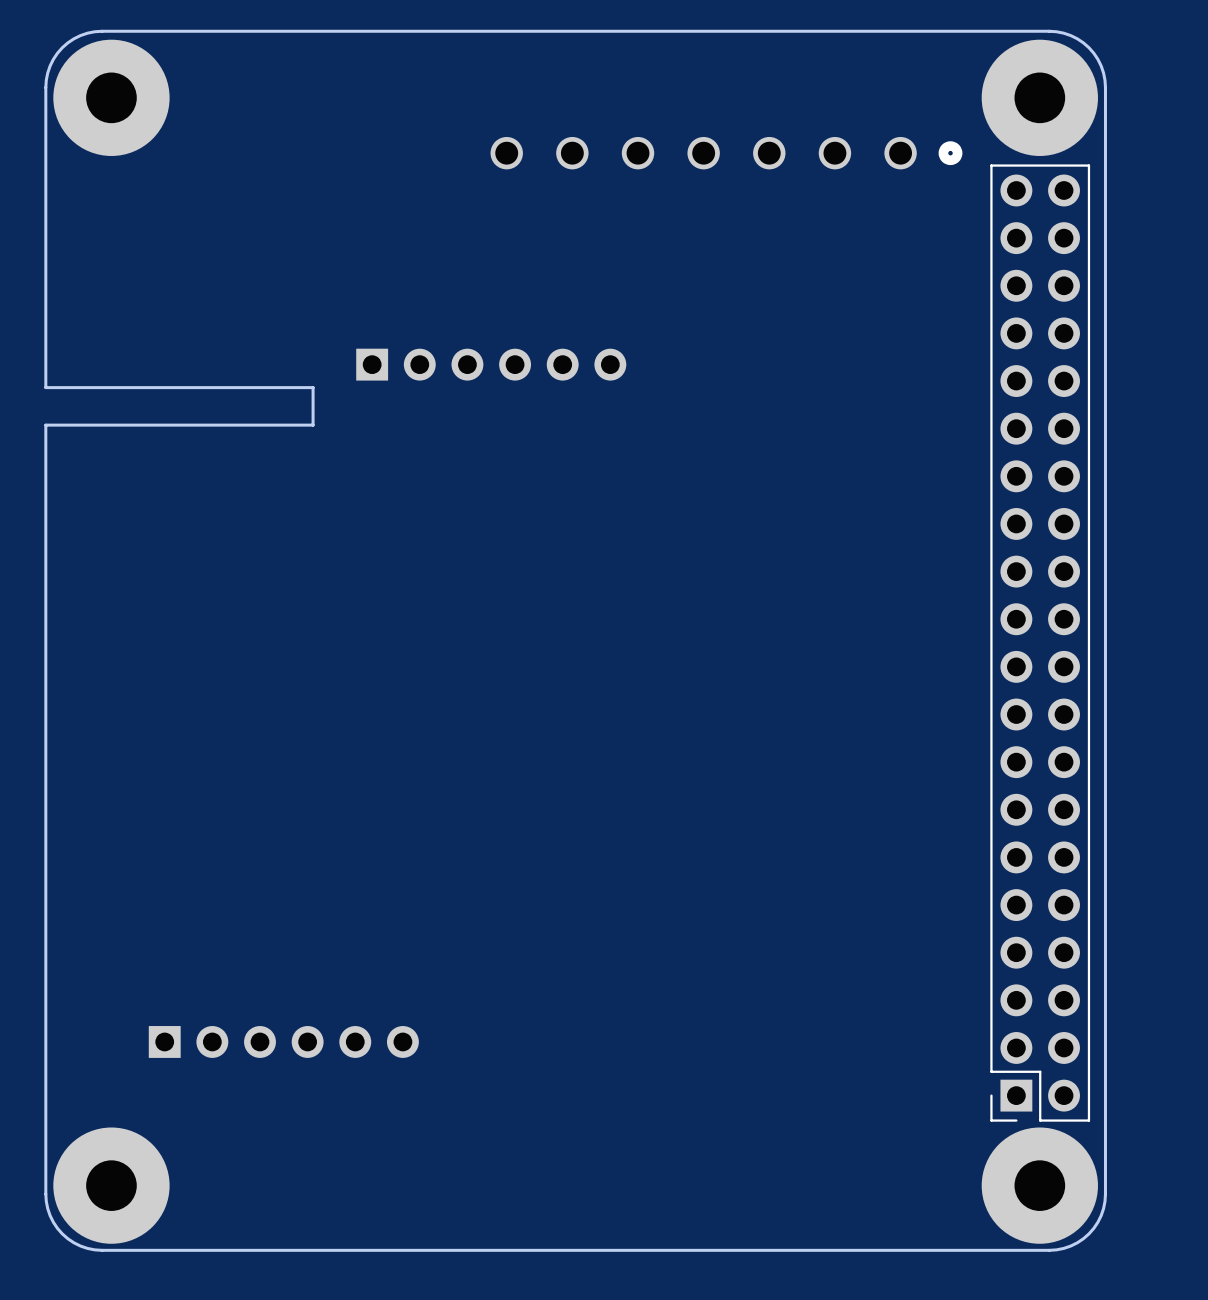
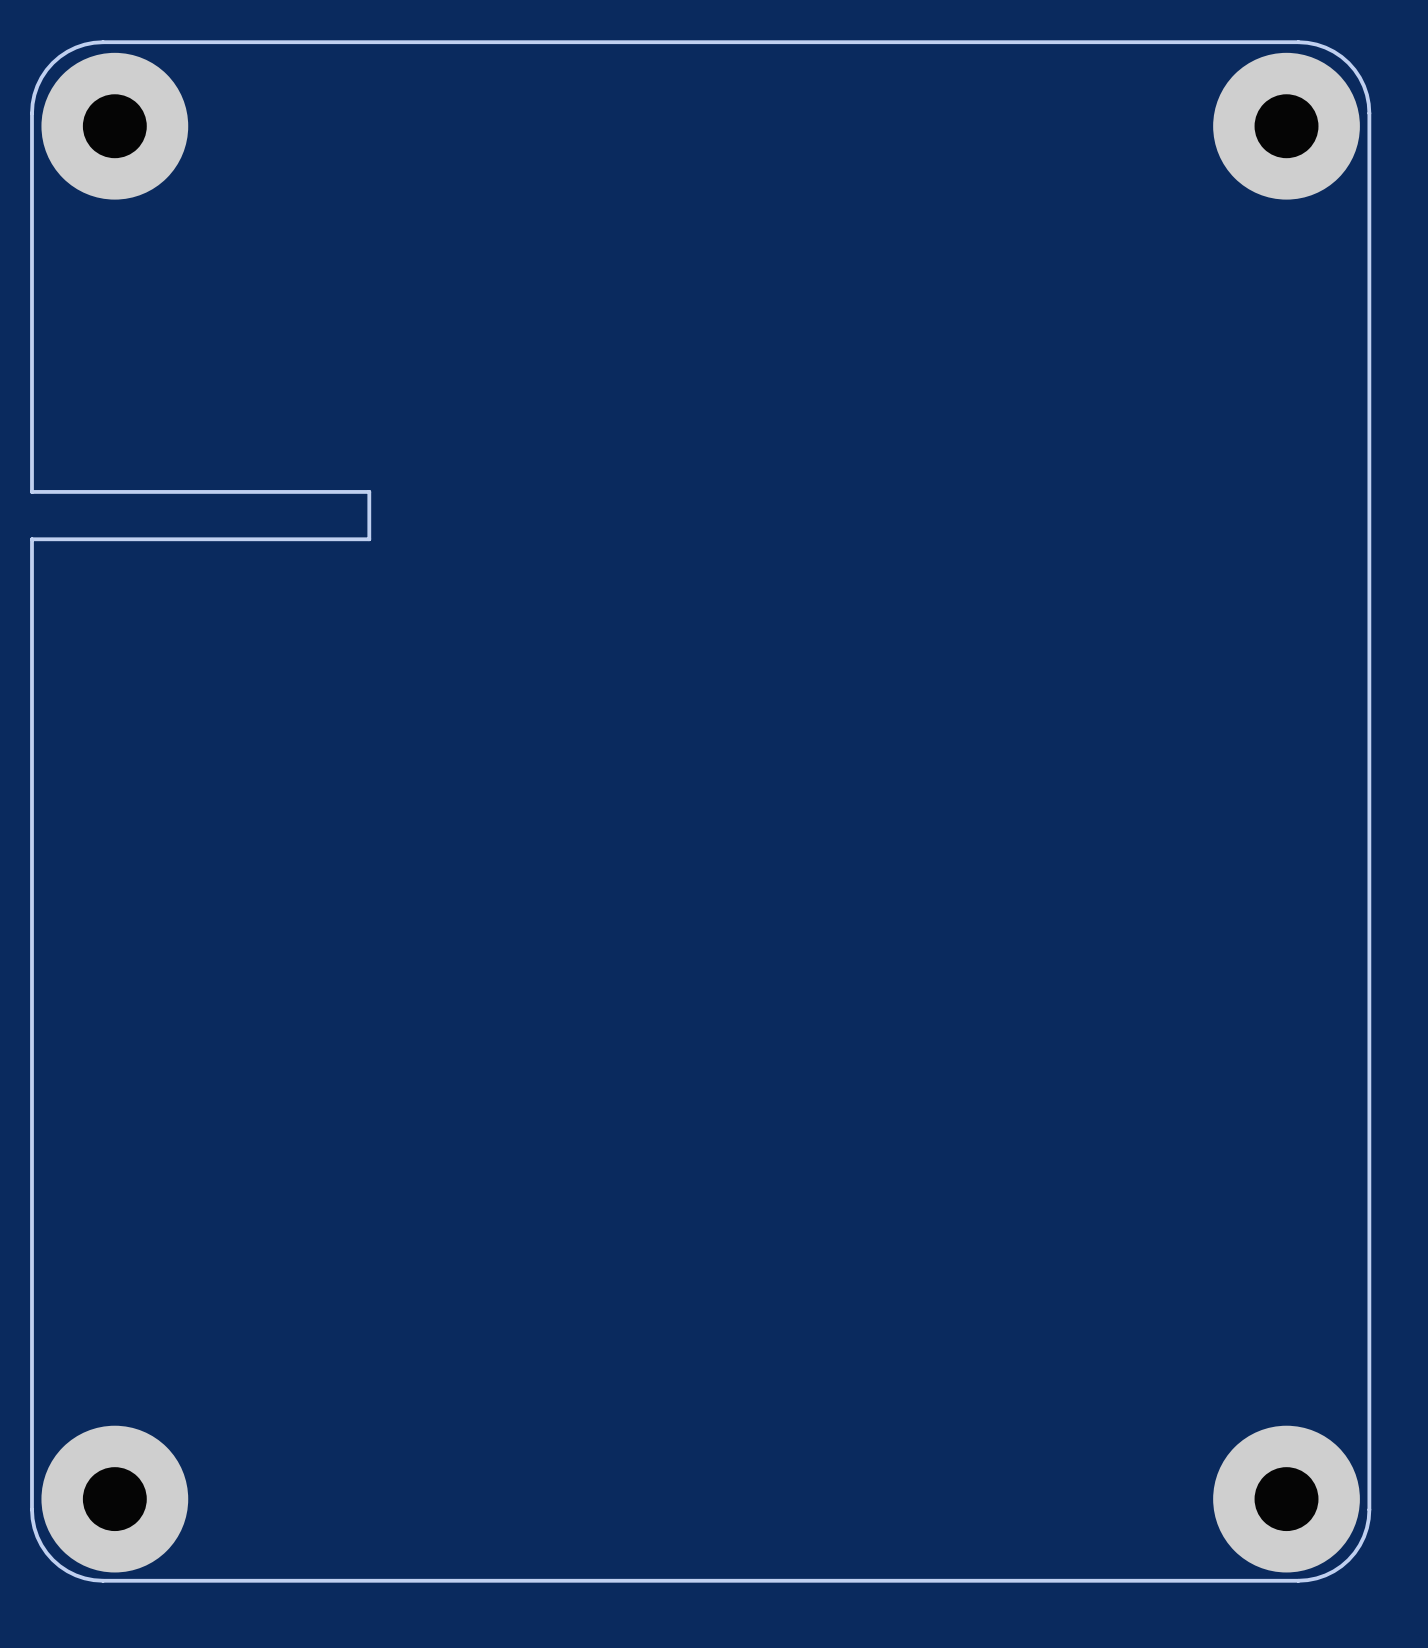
part: (726, 153) -> none
part: (491, 364) -> none
part: (1040, 643) -> none
part: (283, 1041) -> none

